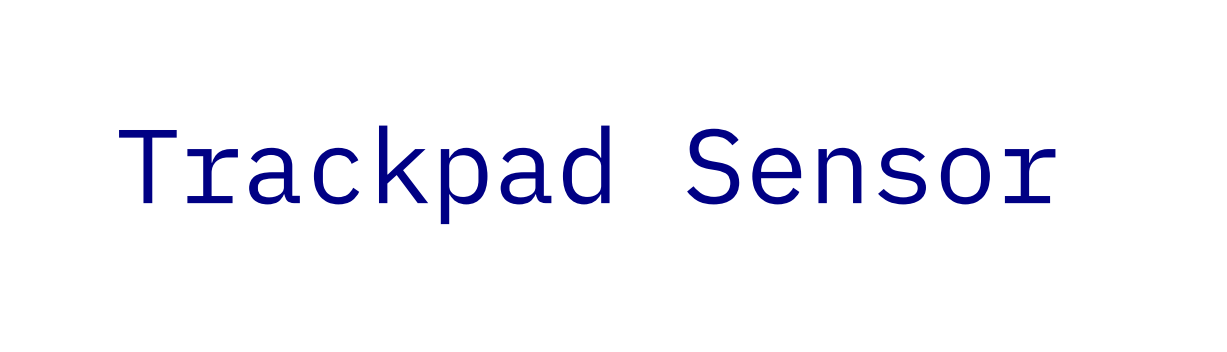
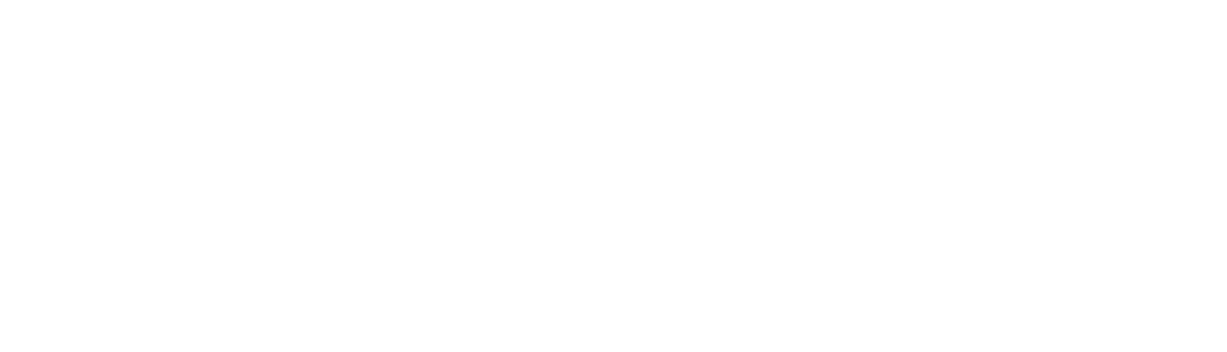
text: Trackpad Sensor (587, 174) -> none

